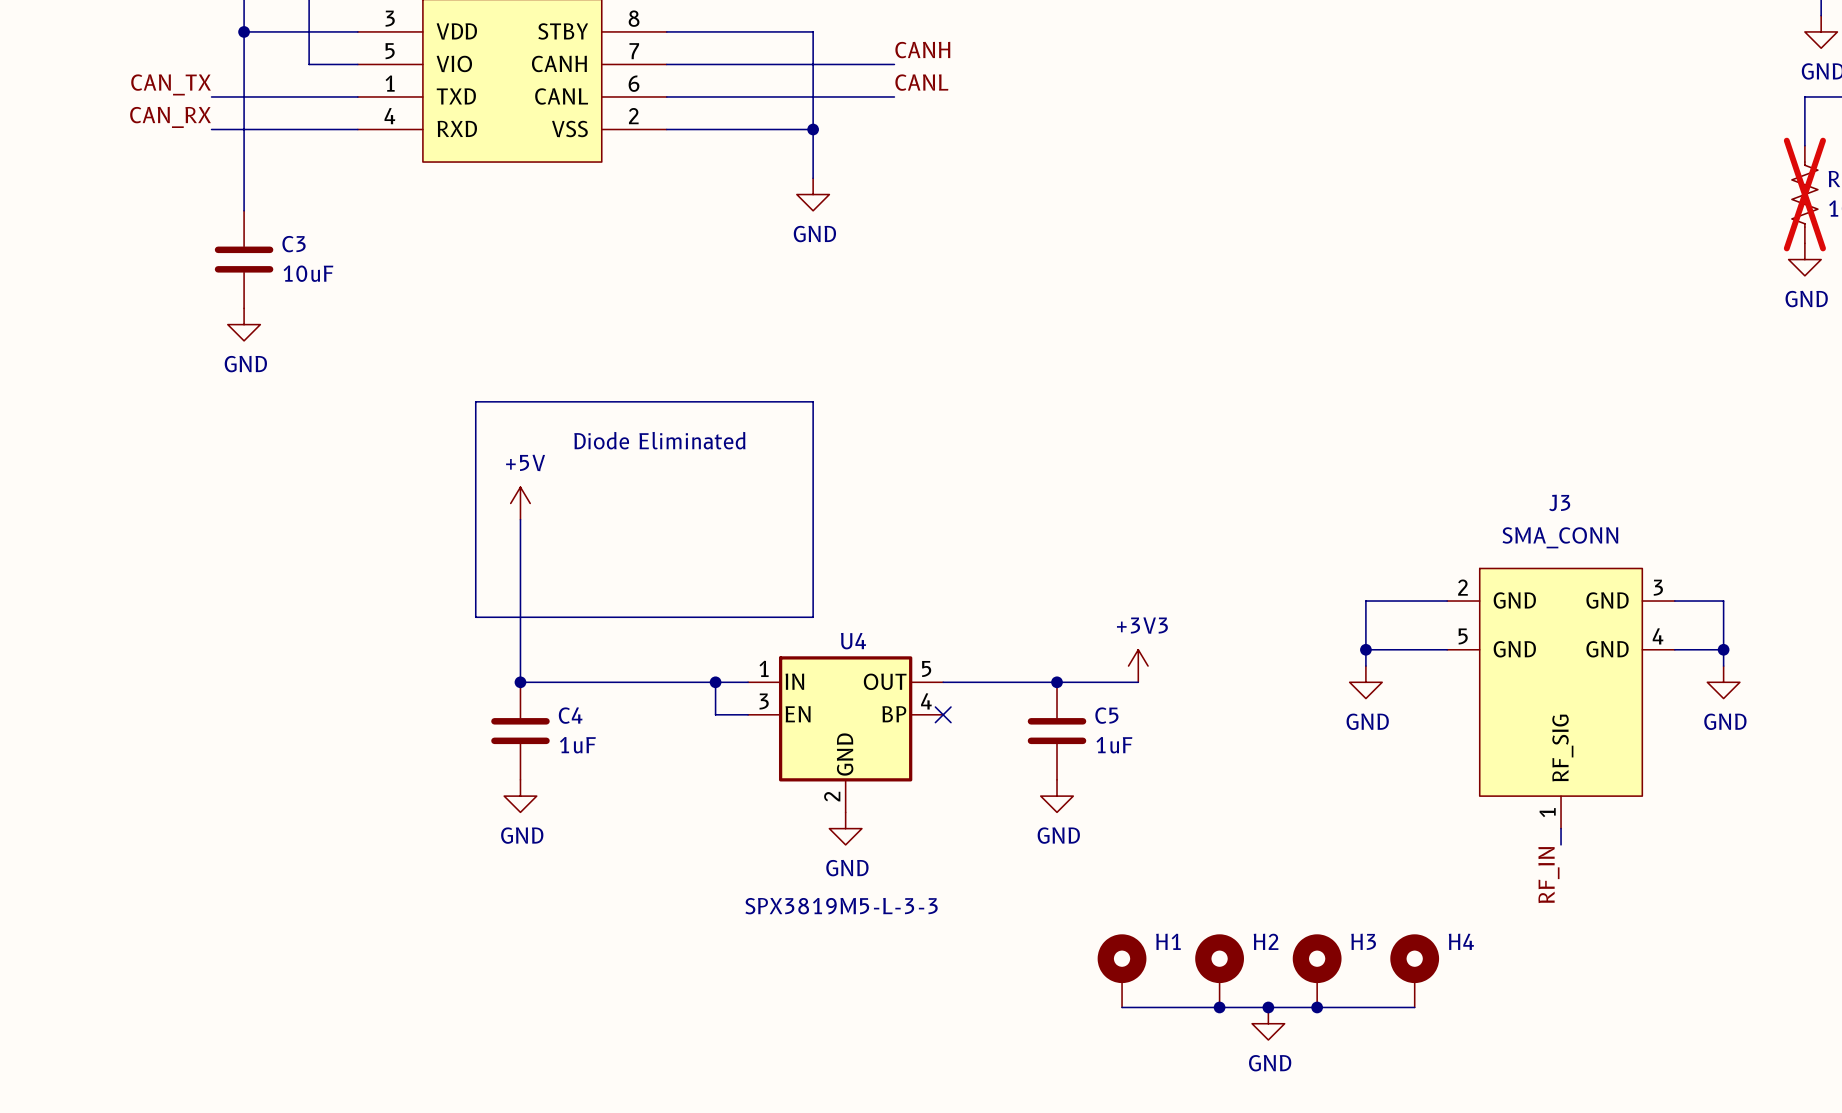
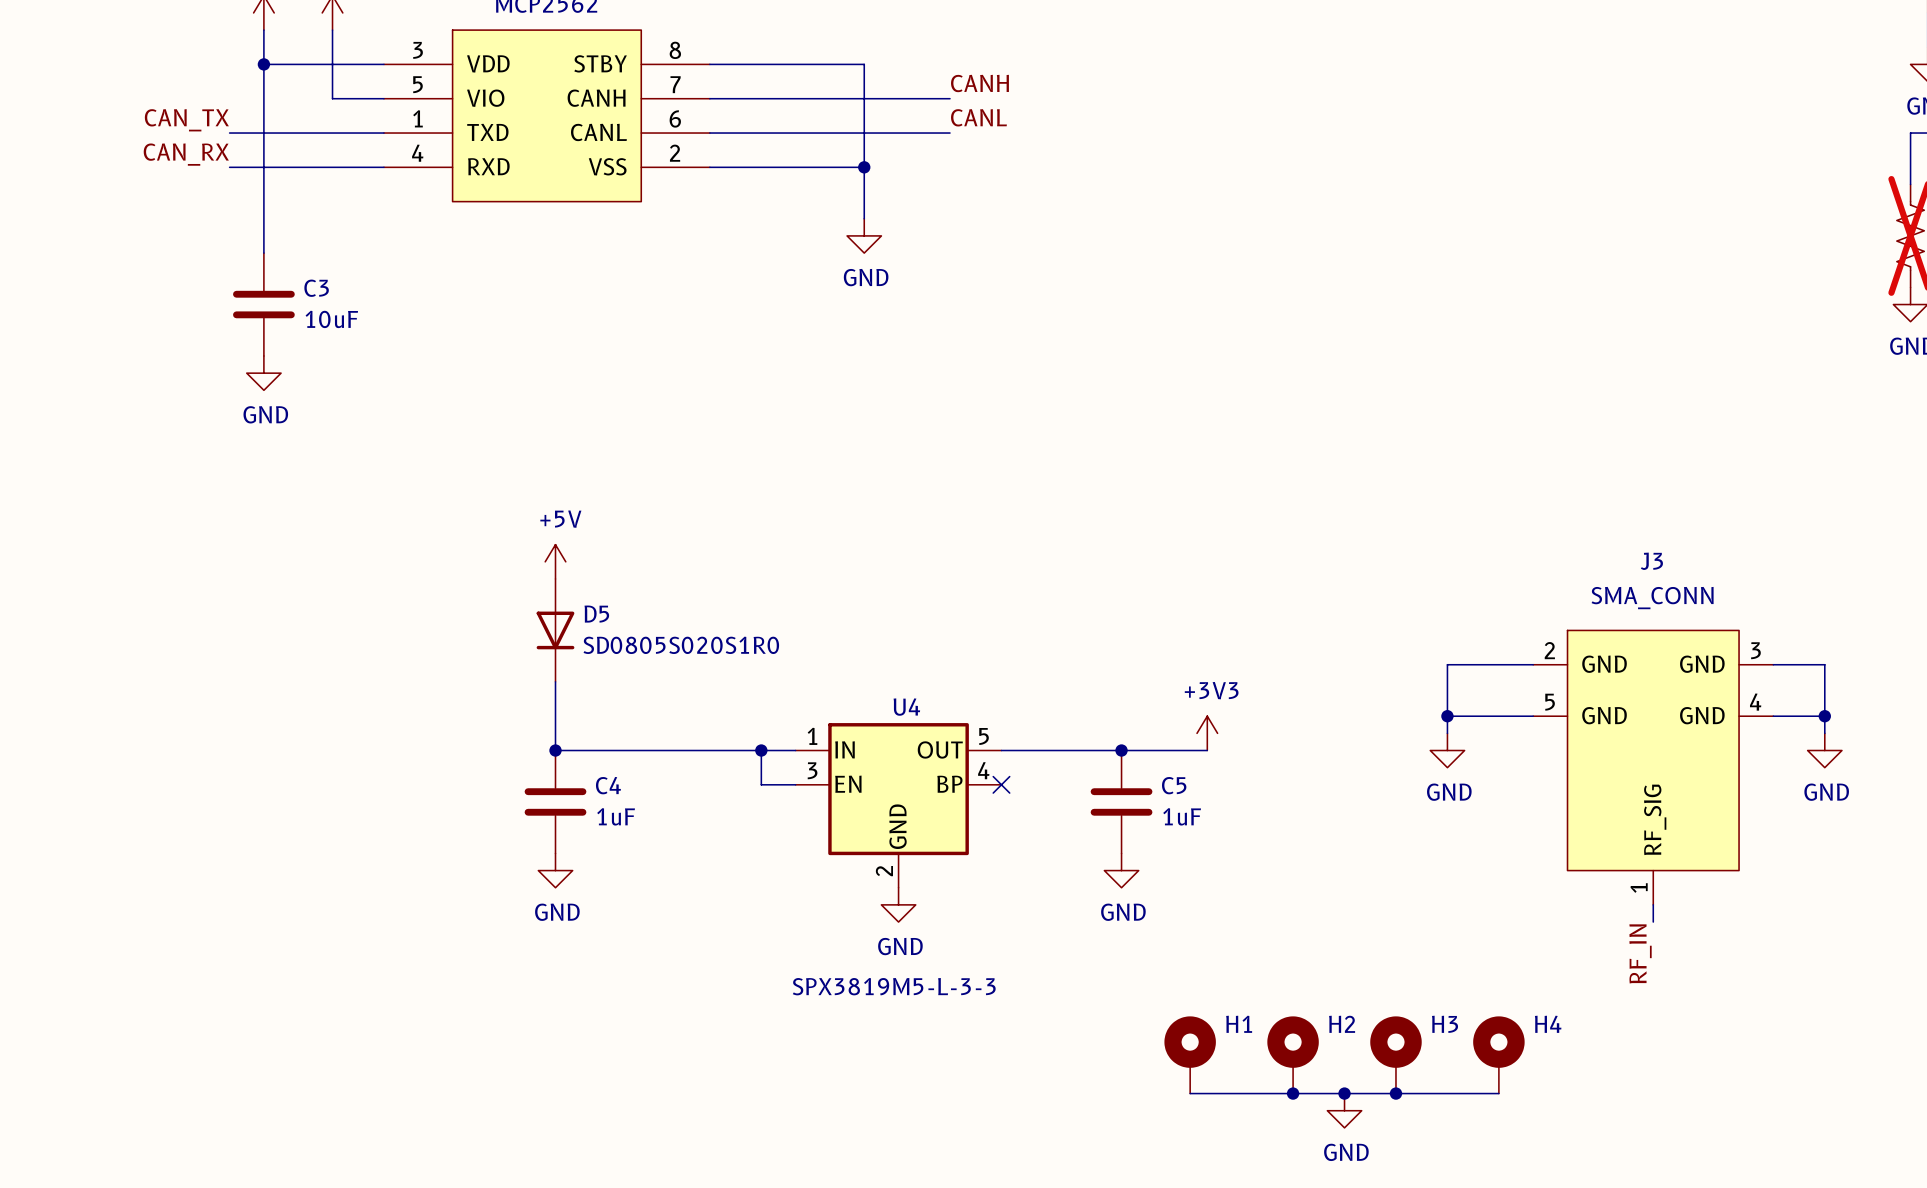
line: (475, 401) (813, 401) (813, 617) (475, 617) (475, 401) -> none
text: Diode Eliminated (659, 440) -> none
D5: none -> SD0805S020S1R0 (555, 630)

